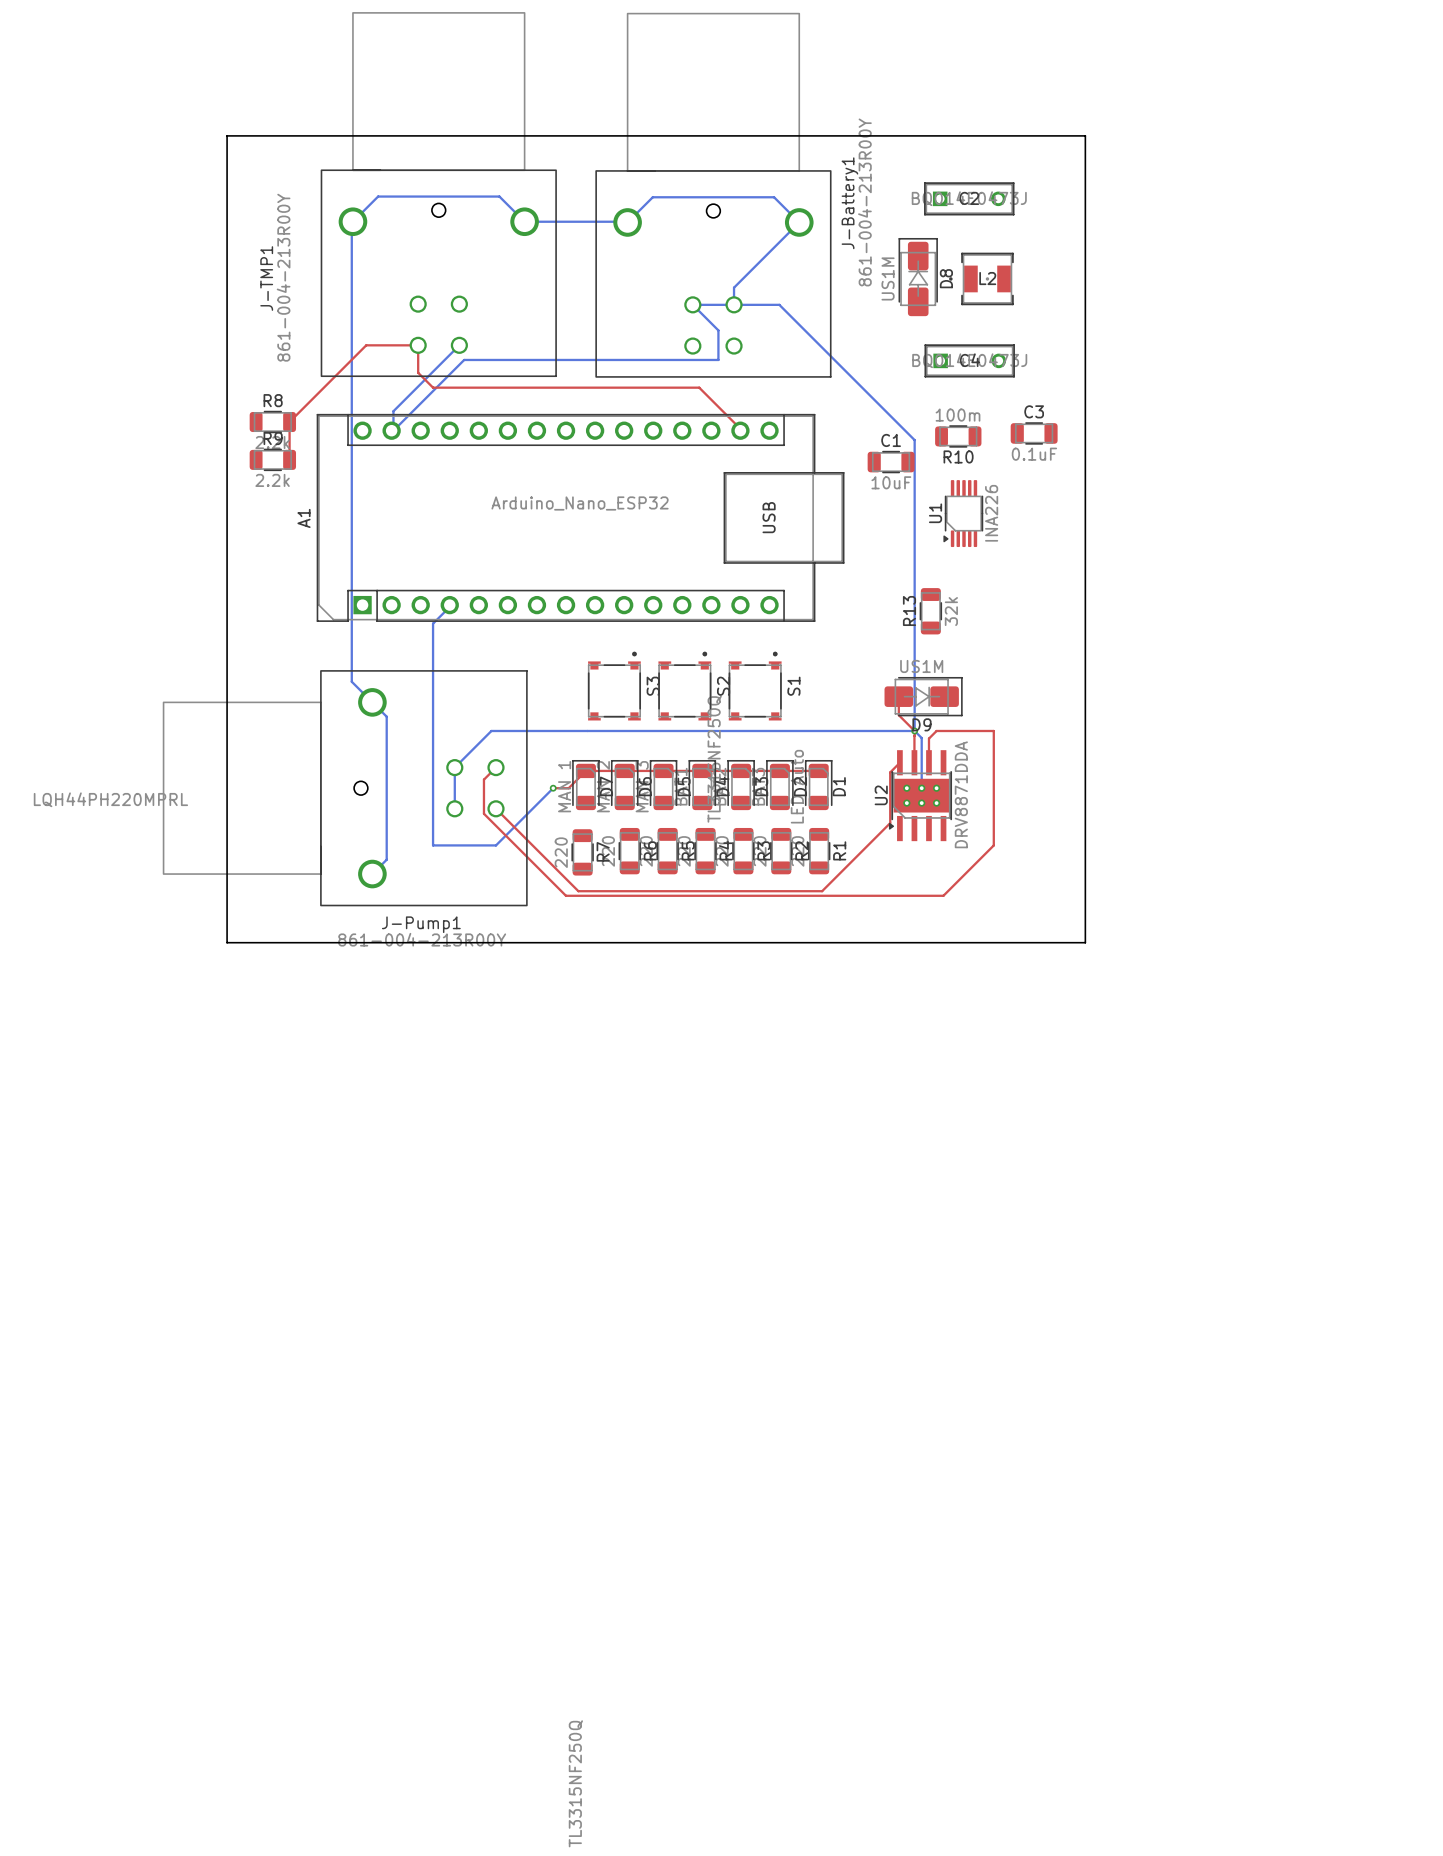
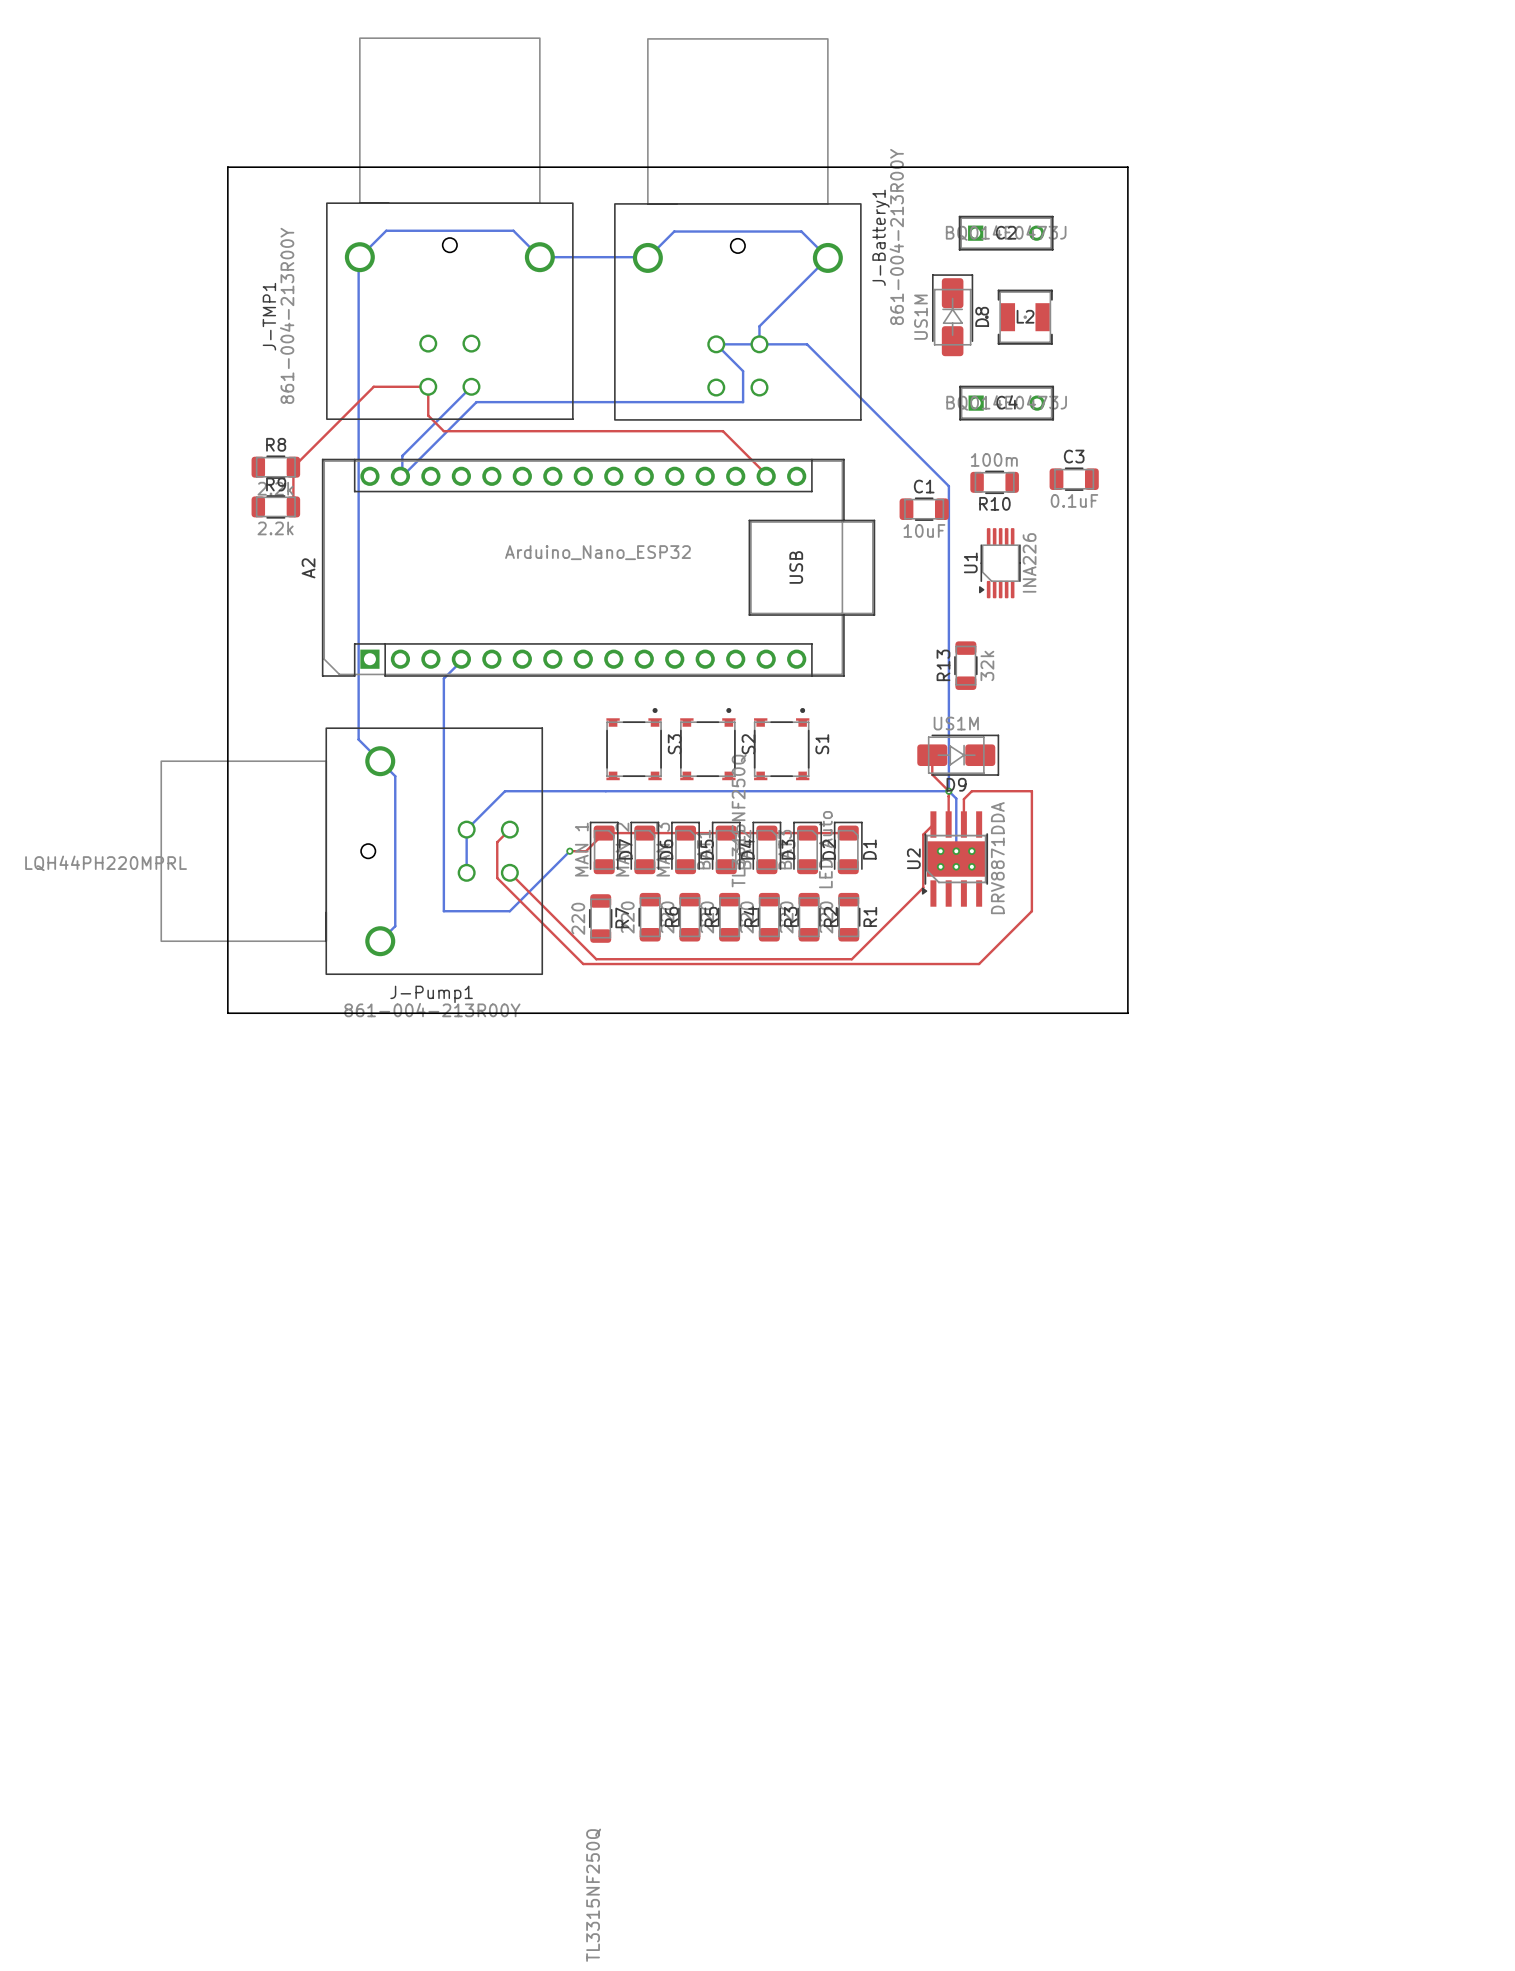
A1 name: A1 (304, 518) -> A2 (308, 568)

